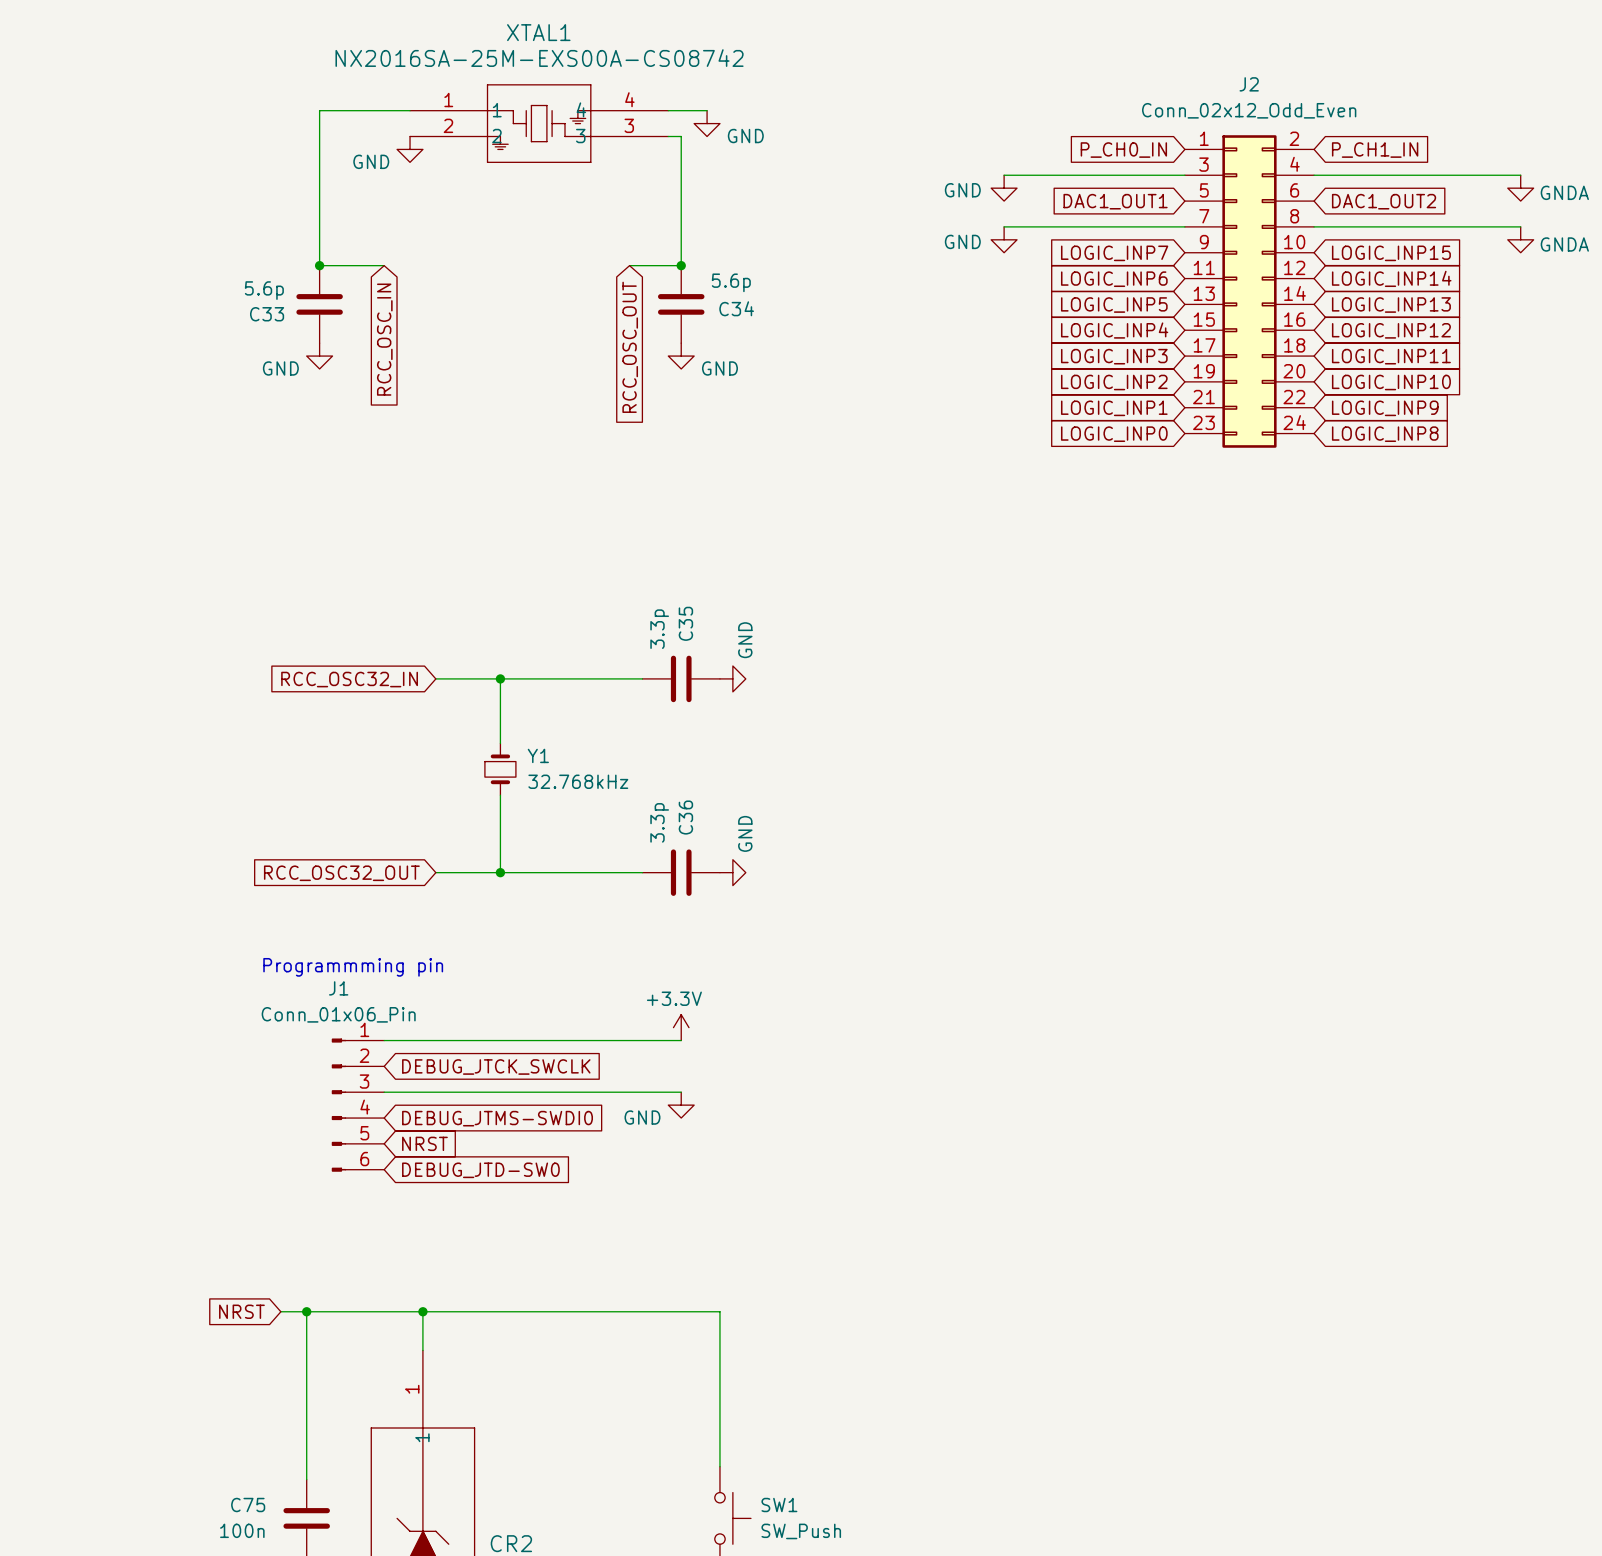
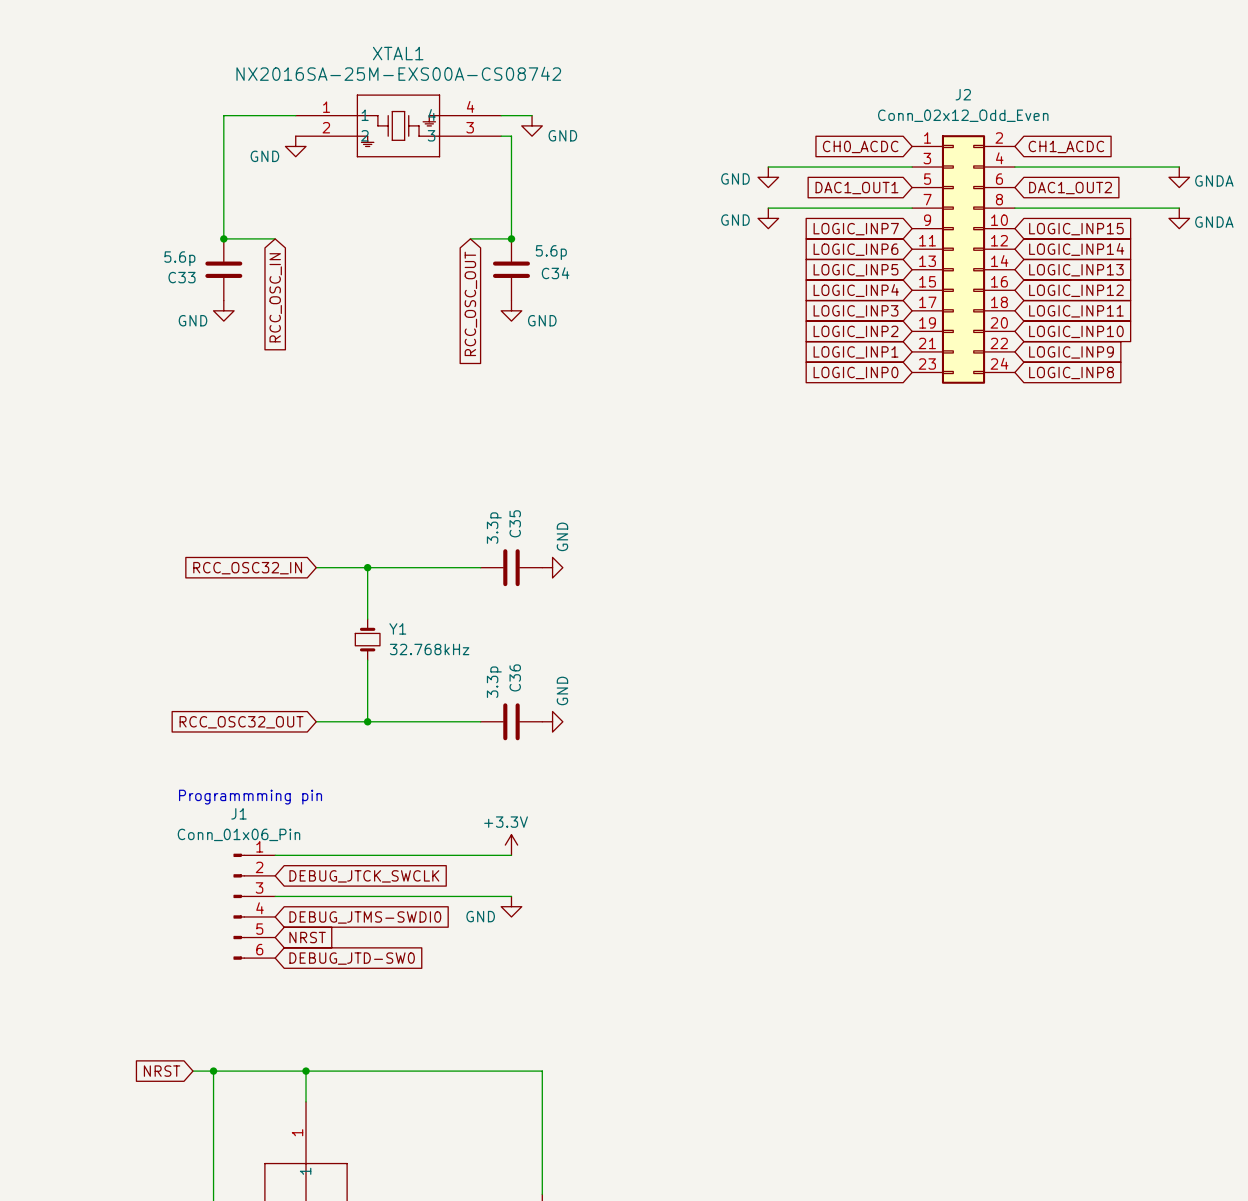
global label: P_CH0_IN (1123, 150) -> CH0_ACDC (860, 146)
global label: P_CH1_IN (1375, 150) -> CH1_ACDC (1066, 146)

